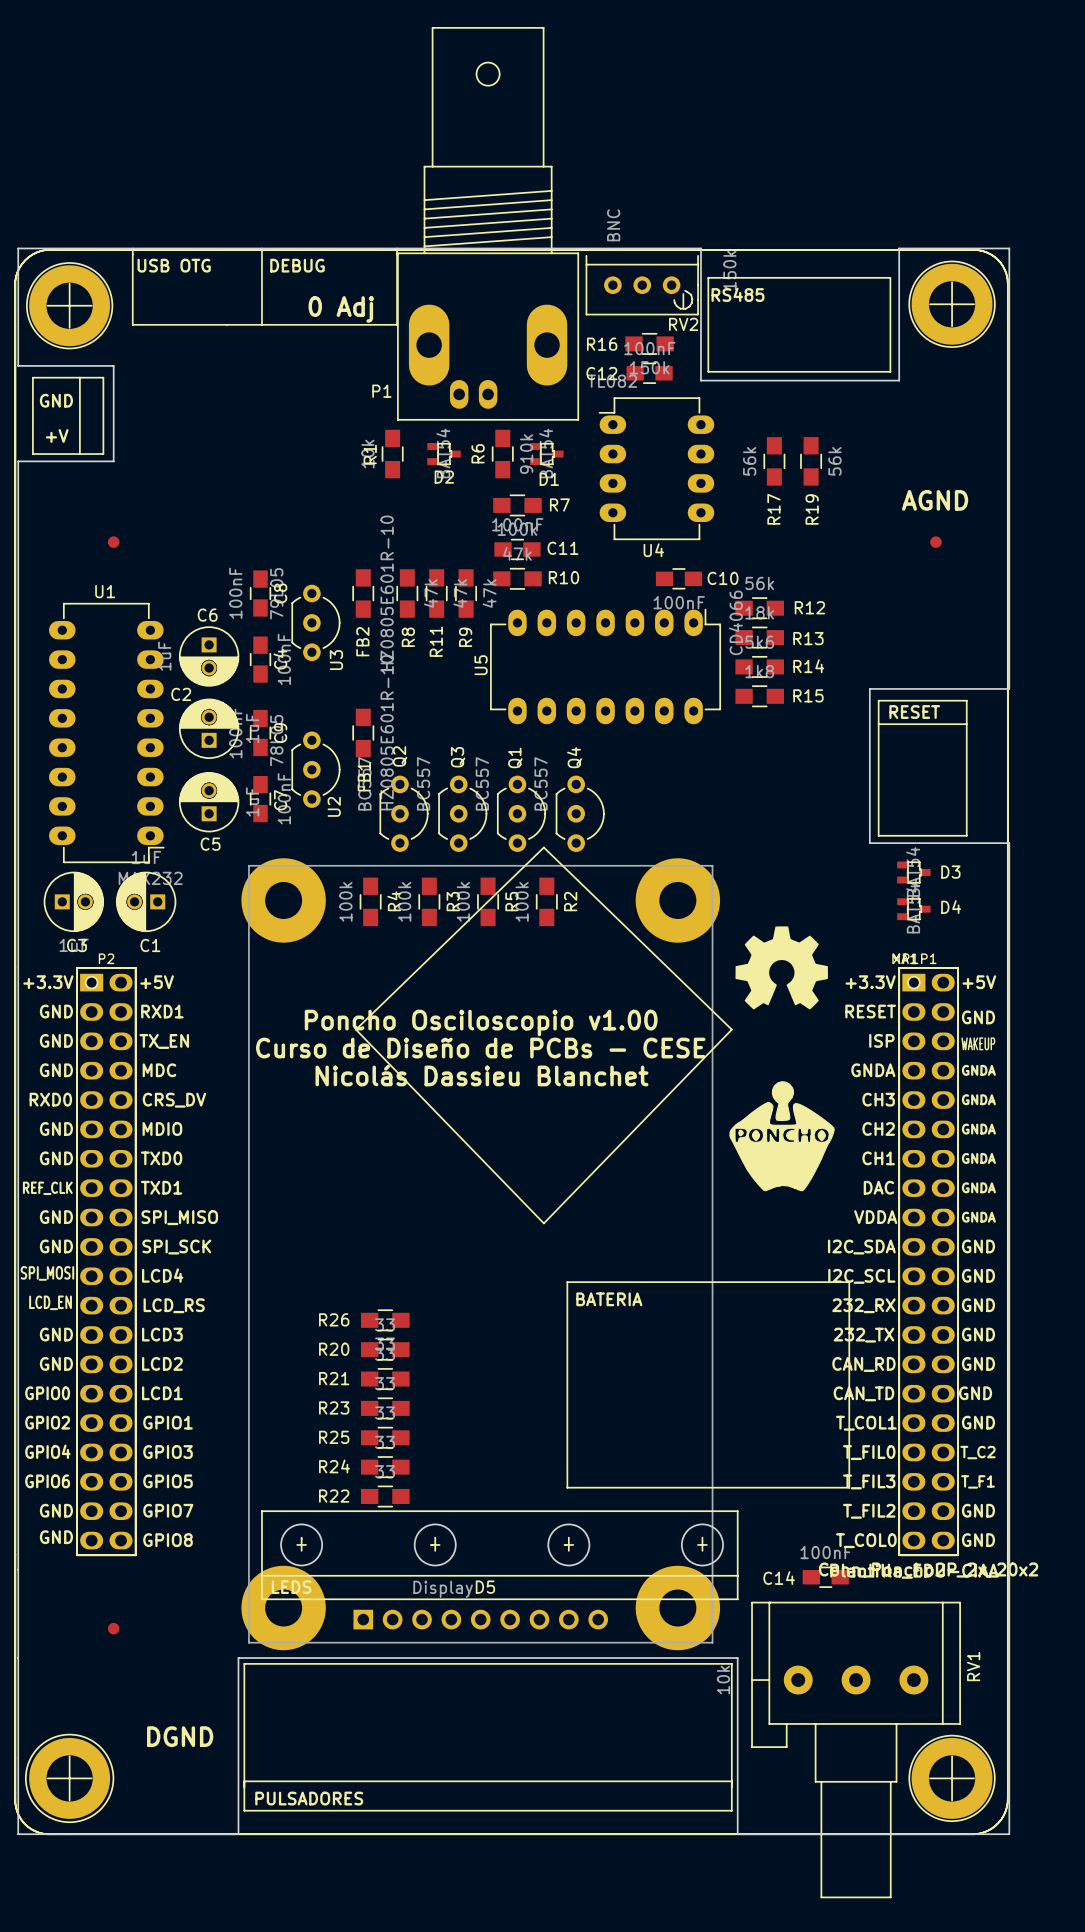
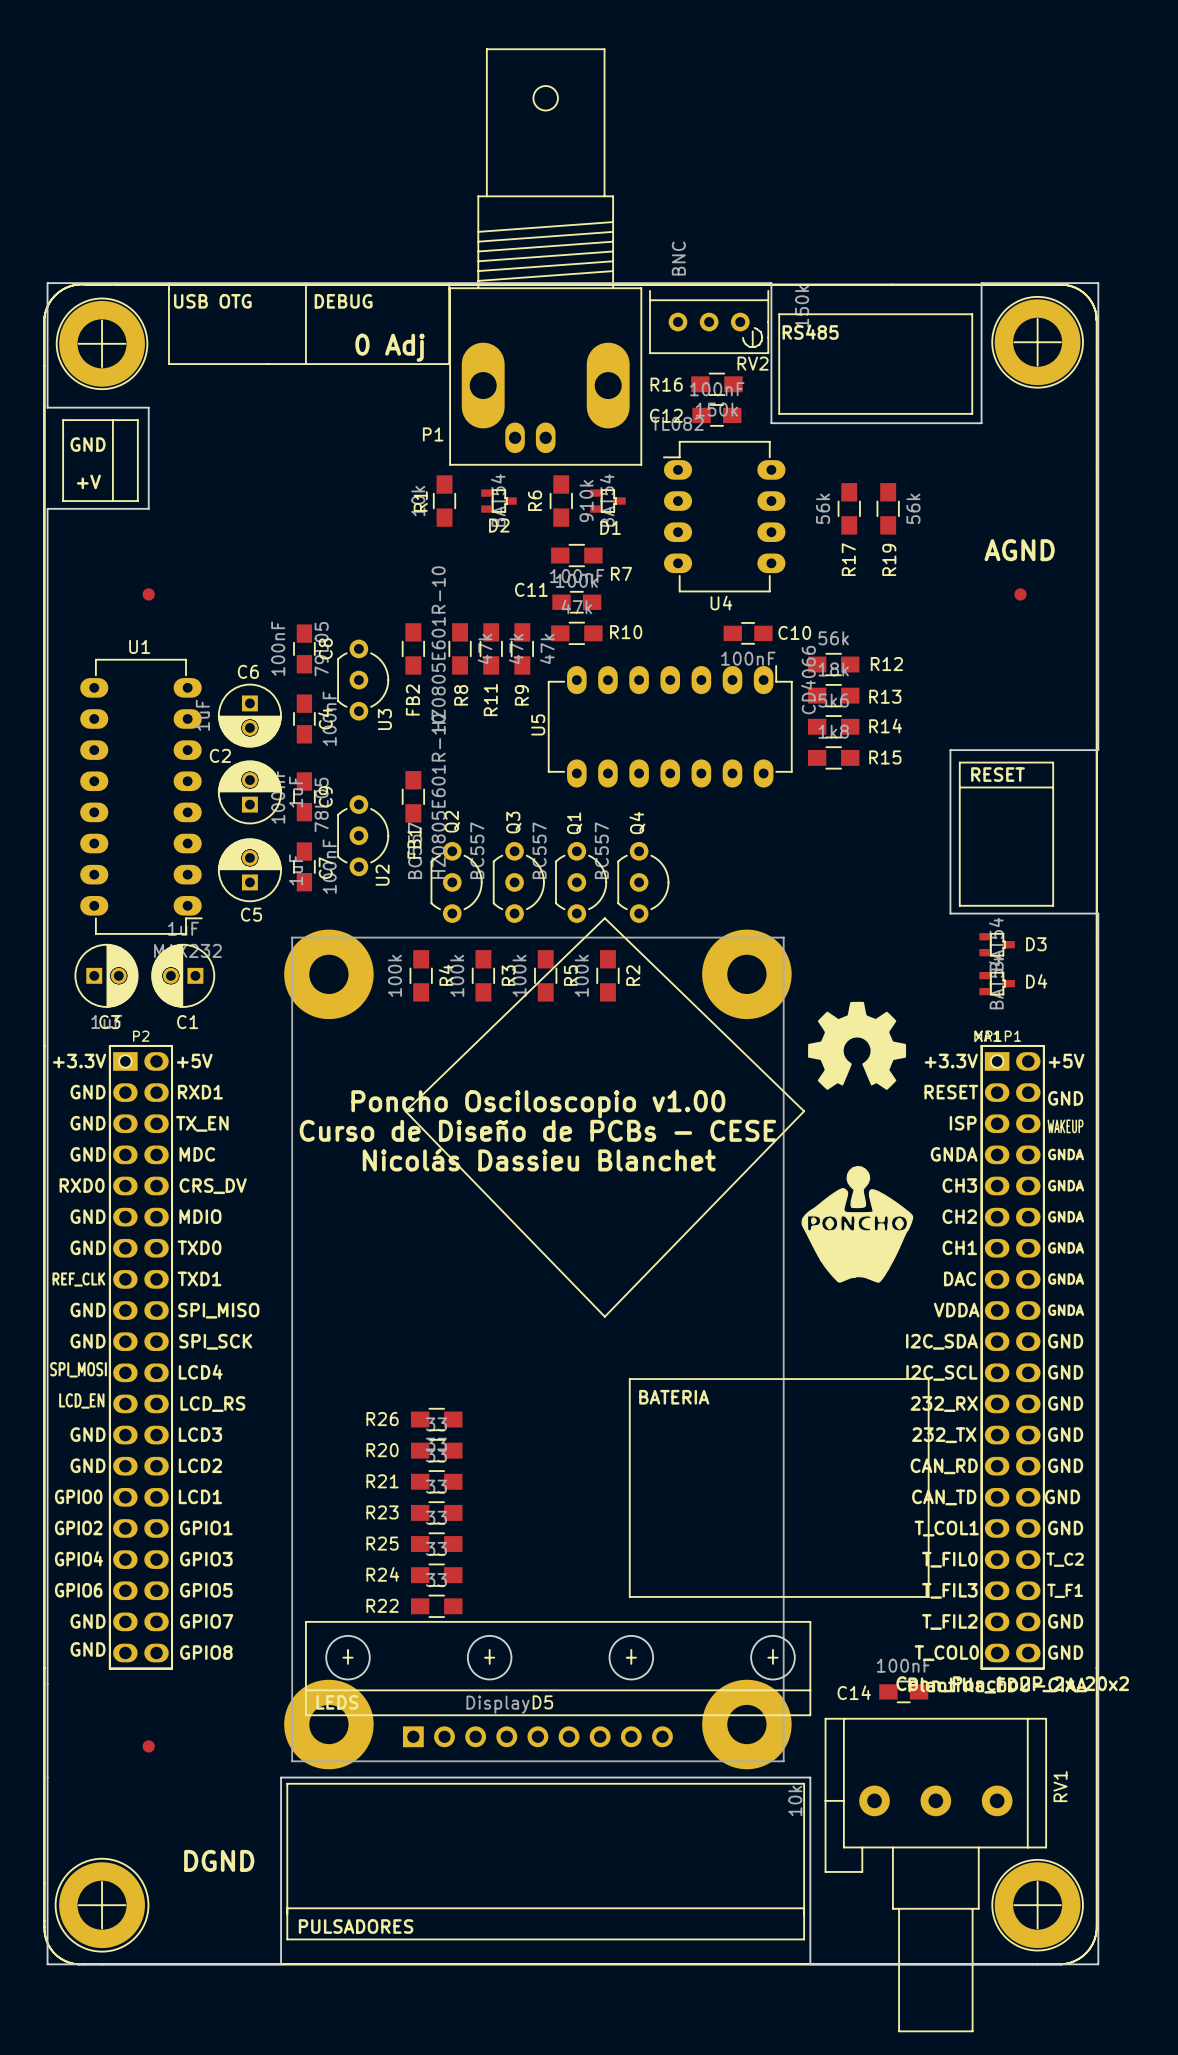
R7 name position: R7 (559, 504) -> R7 (621, 573)
C11 name position: C11 (562, 548) -> C11 (531, 589)

